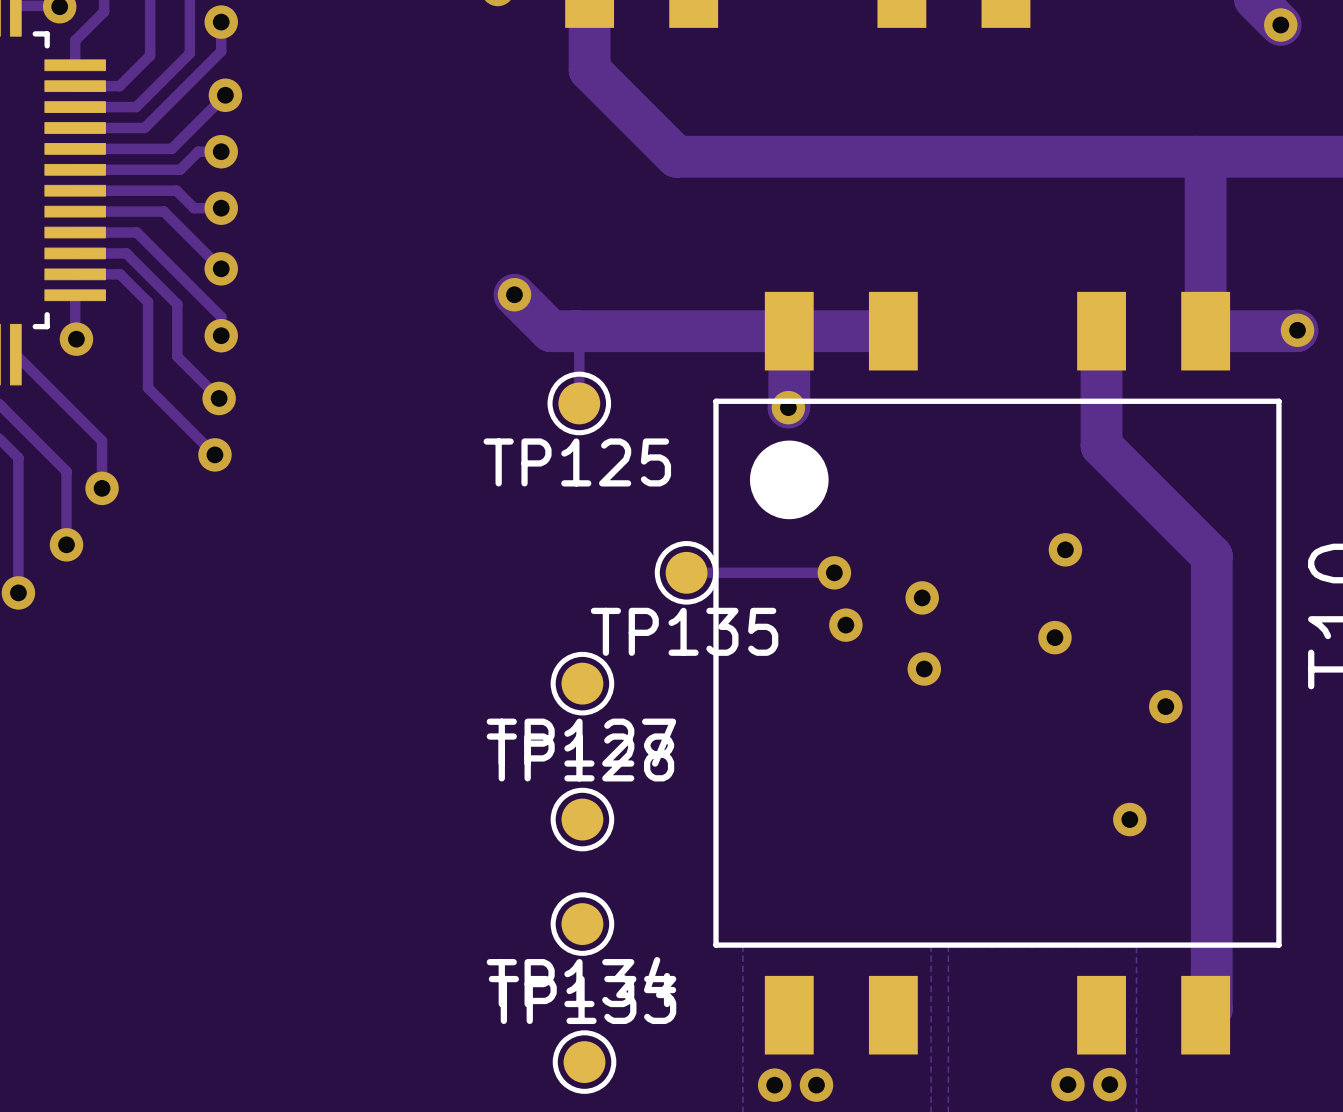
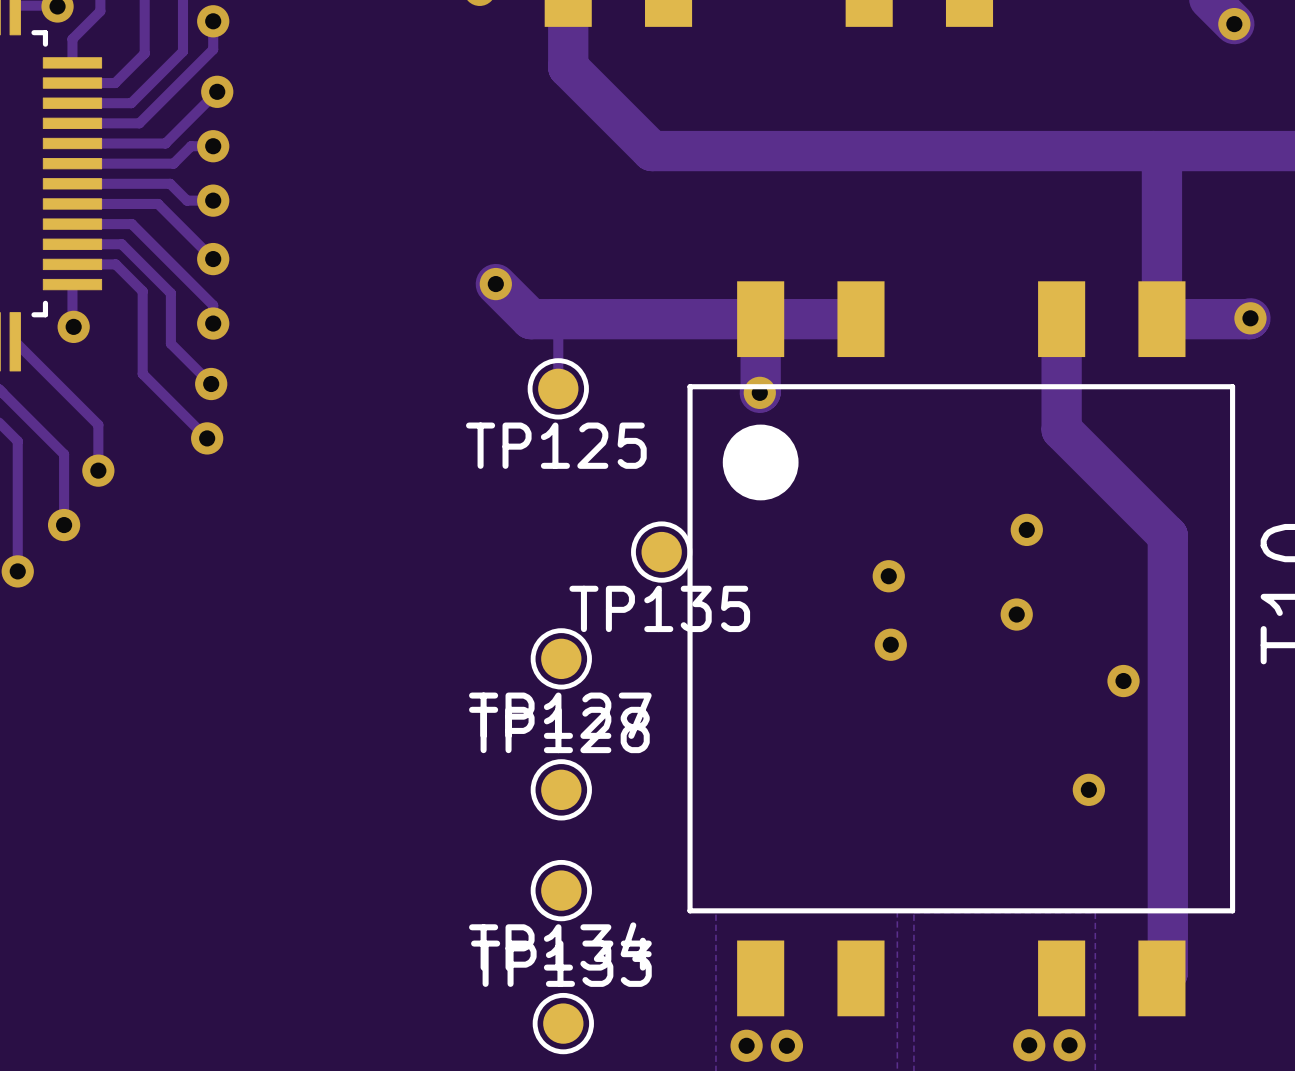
track: (686, 572) (834, 572) -> none
via: (834, 572) -> none
via: (845, 625) -> none

